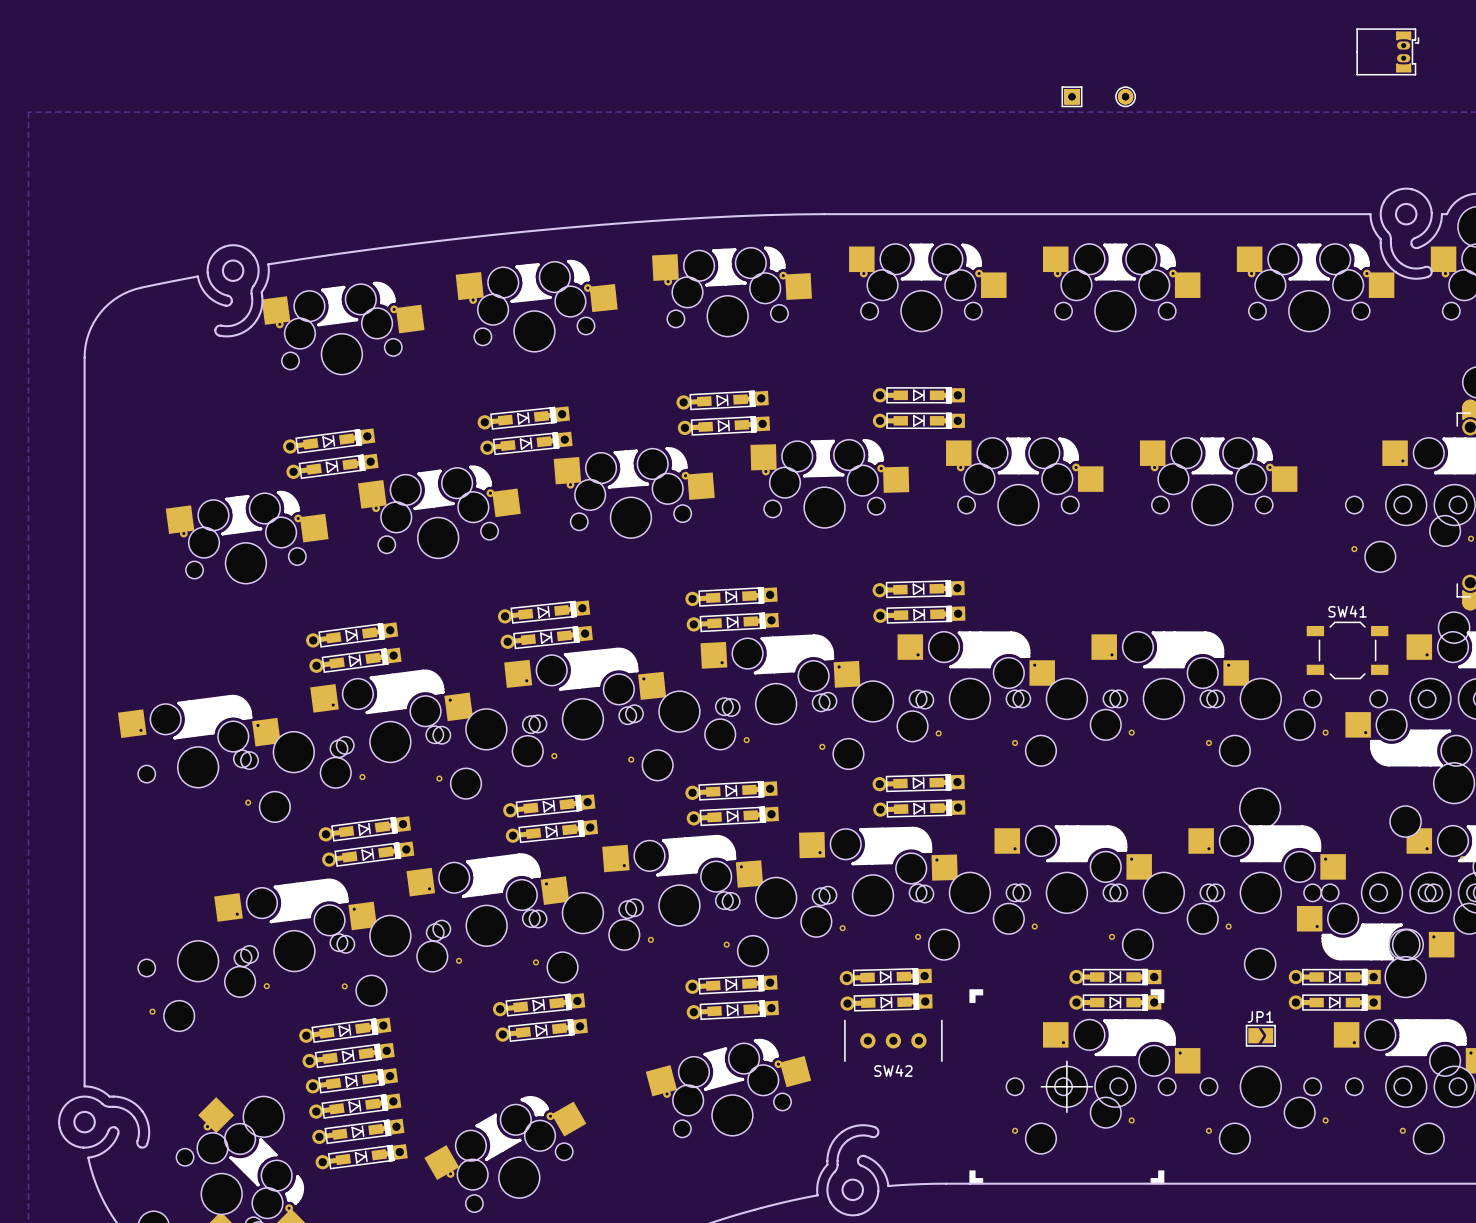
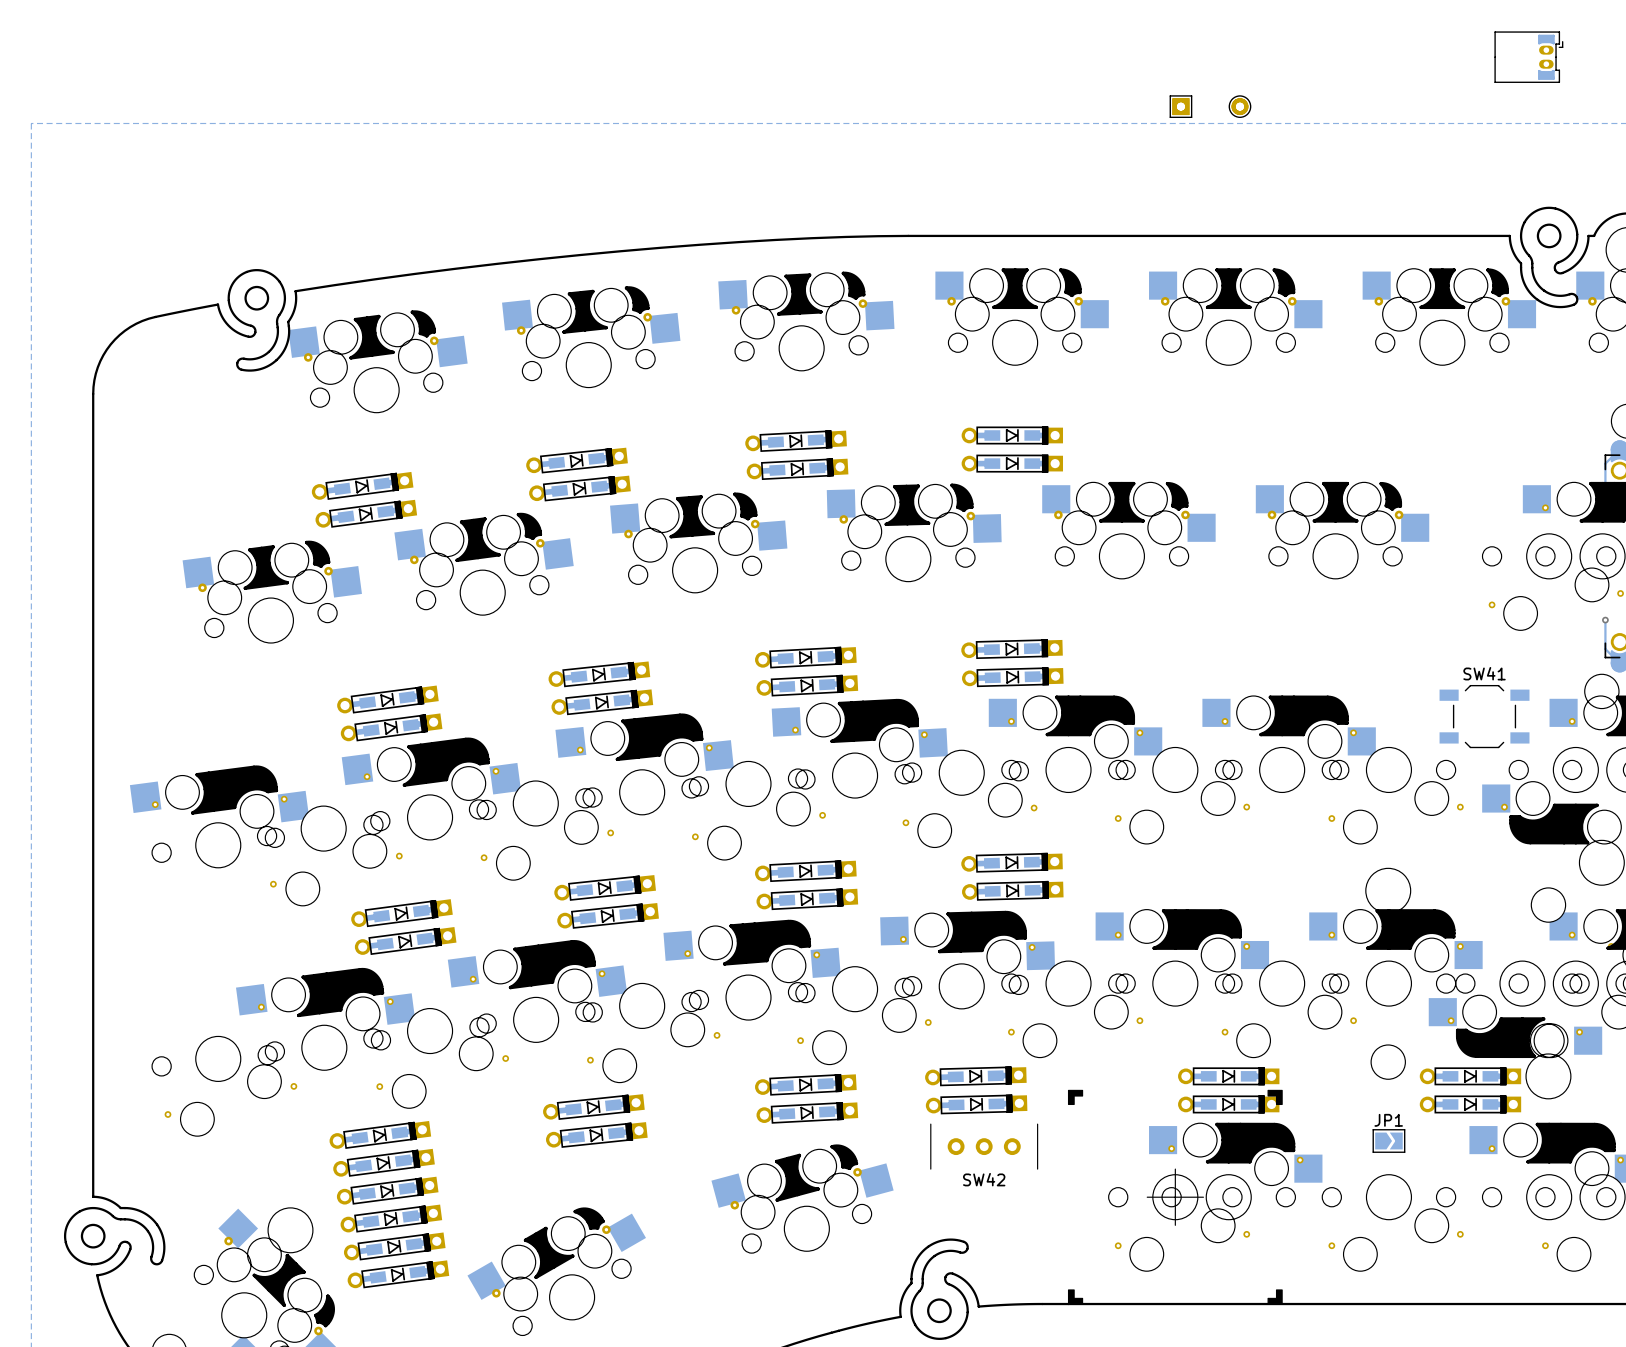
track: none -> (1619, 449) (1605, 463) (1605, 494)
track: none -> (1605, 620) (1605, 649) (1619, 663)
via: none -> (1605, 620)

